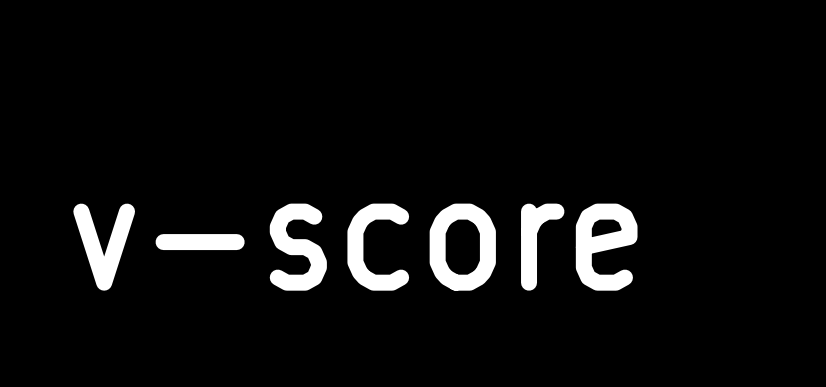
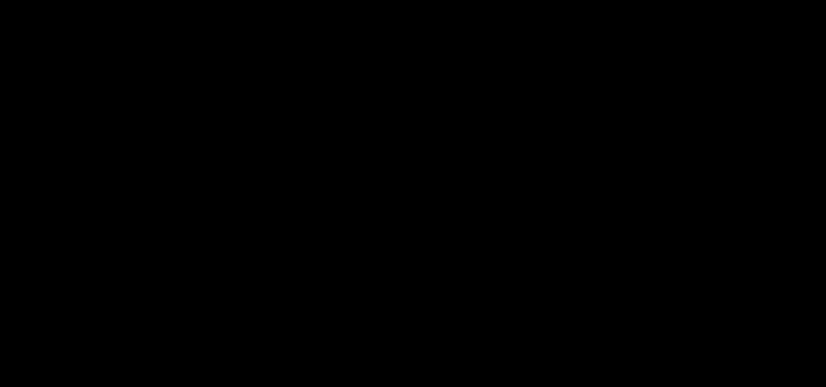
text: v-score (355, 247) -> none

